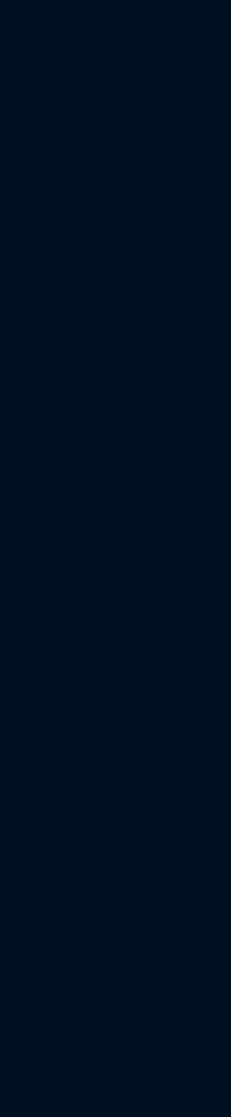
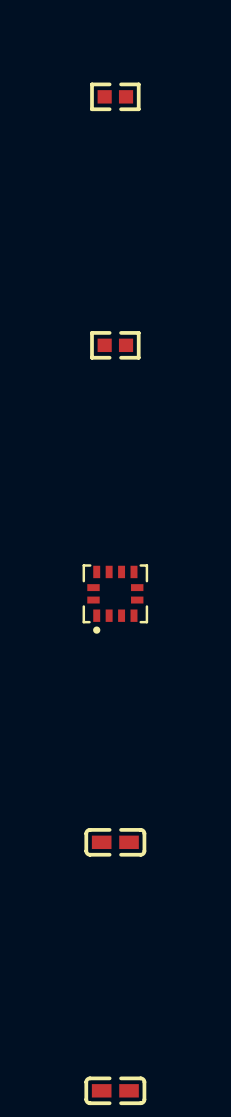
part: none -> (115, 96)
part: none -> (115, 345)
part: none -> (115, 598)
part: none -> (115, 842)
part: none -> (115, 1090)

